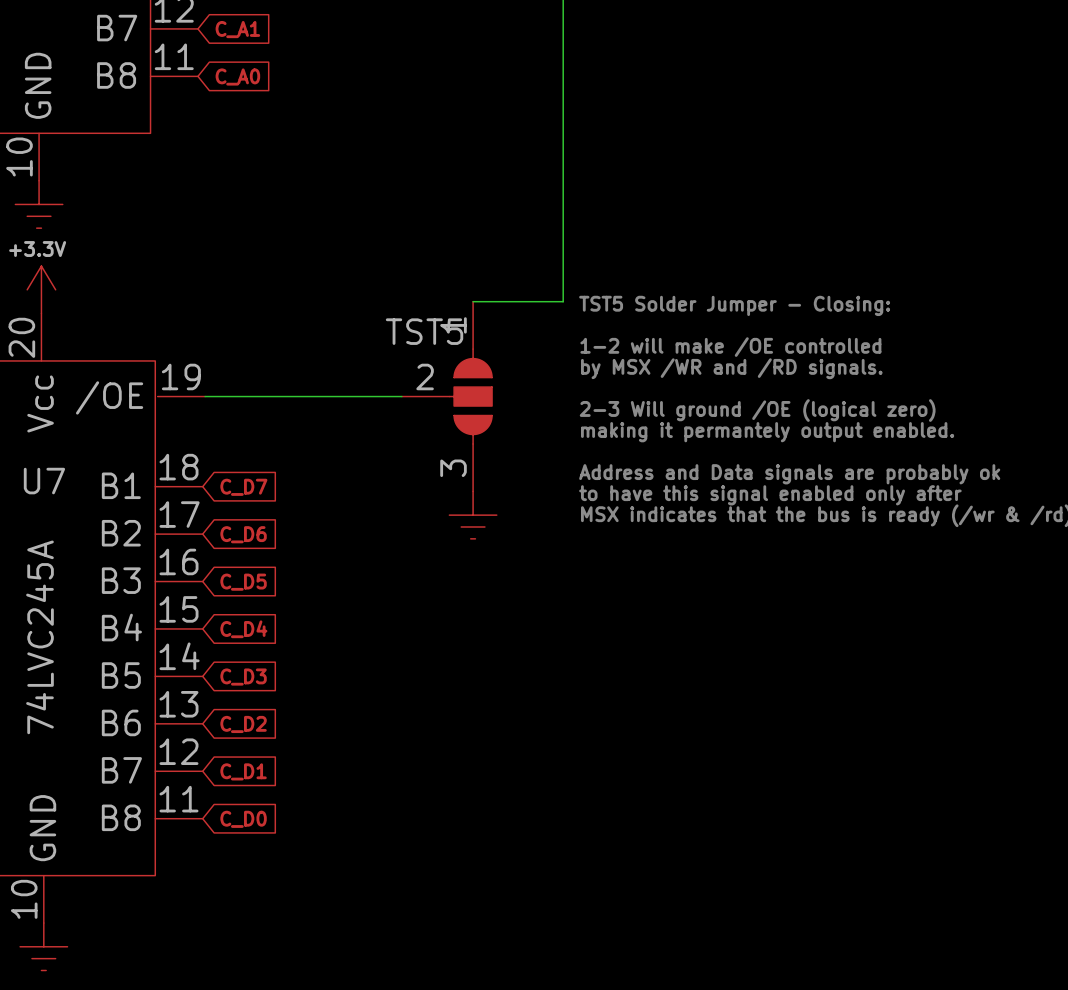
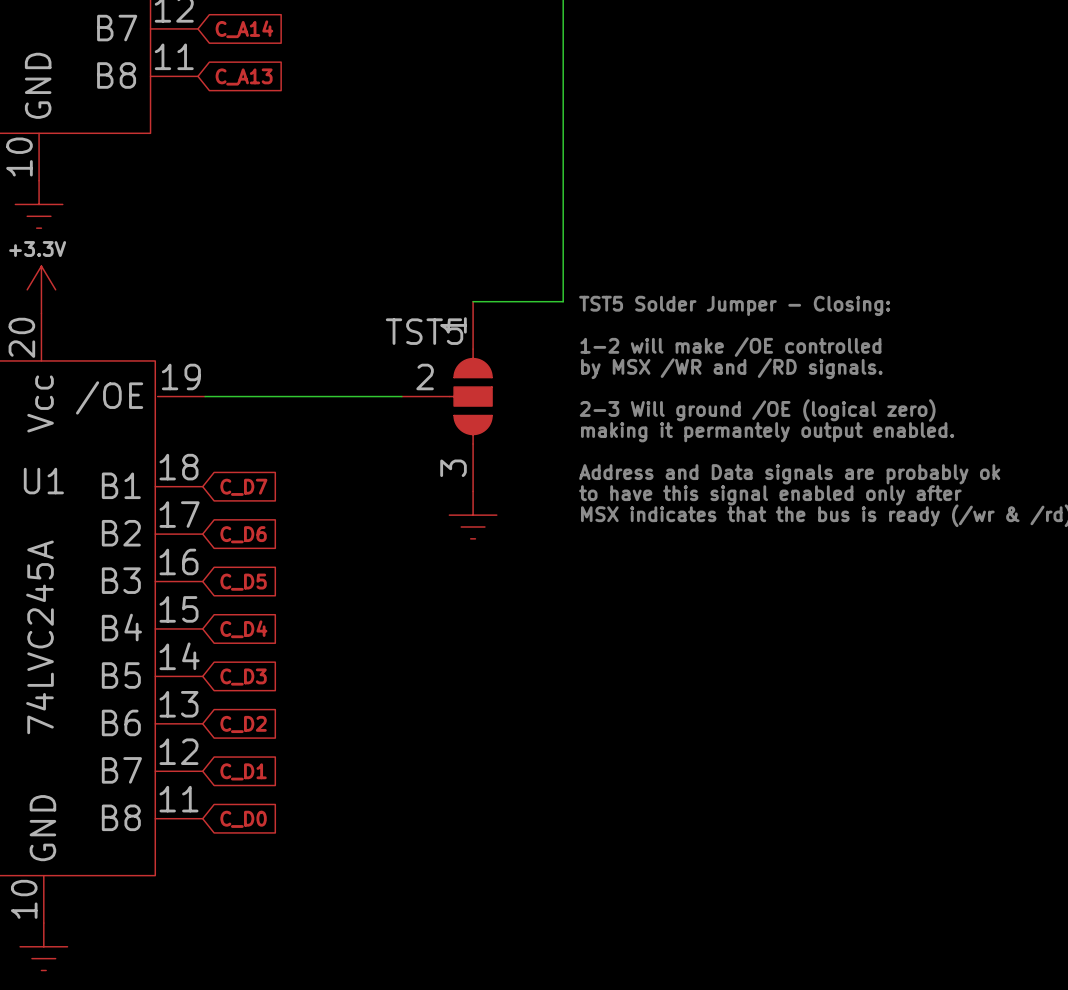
global label: C_A1 (237, 29) -> C_A14 (244, 29)
global label: C_A0 (237, 77) -> C_A13 (244, 77)
U7 name: U7 (44, 481) -> U1 (43, 481)

